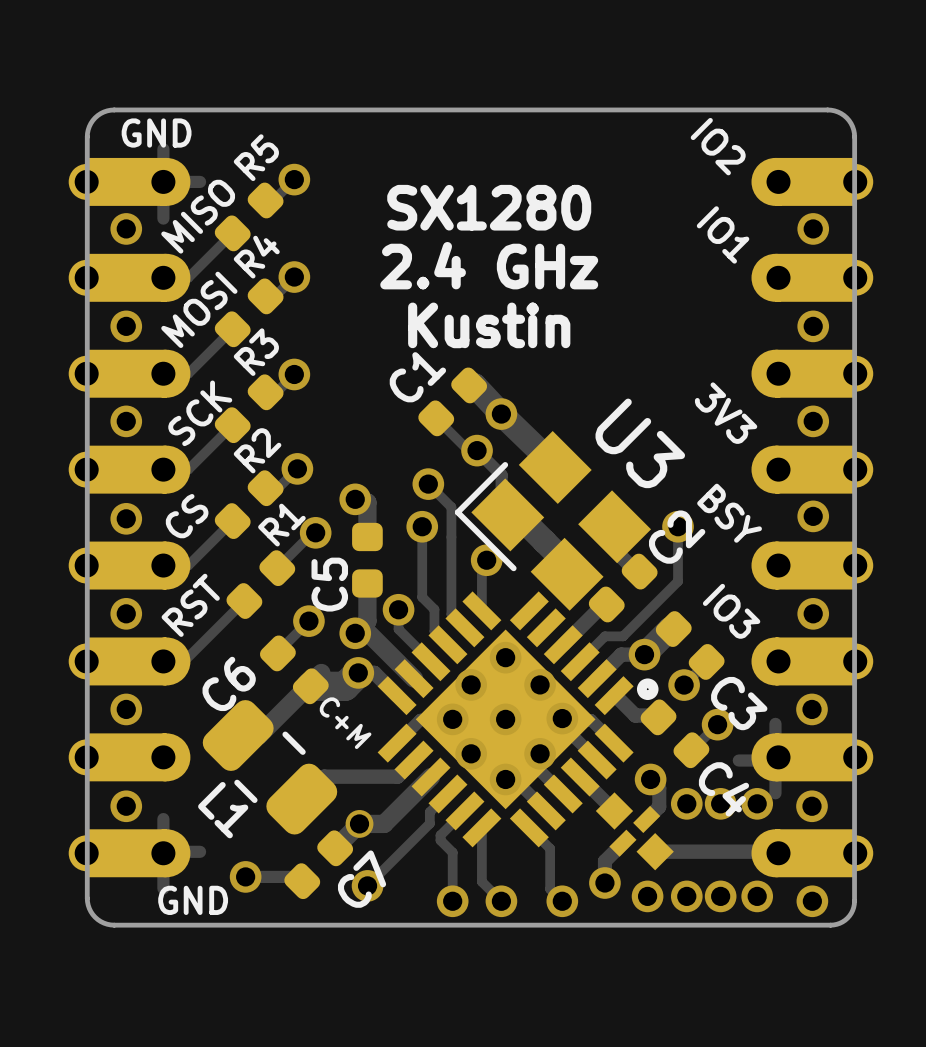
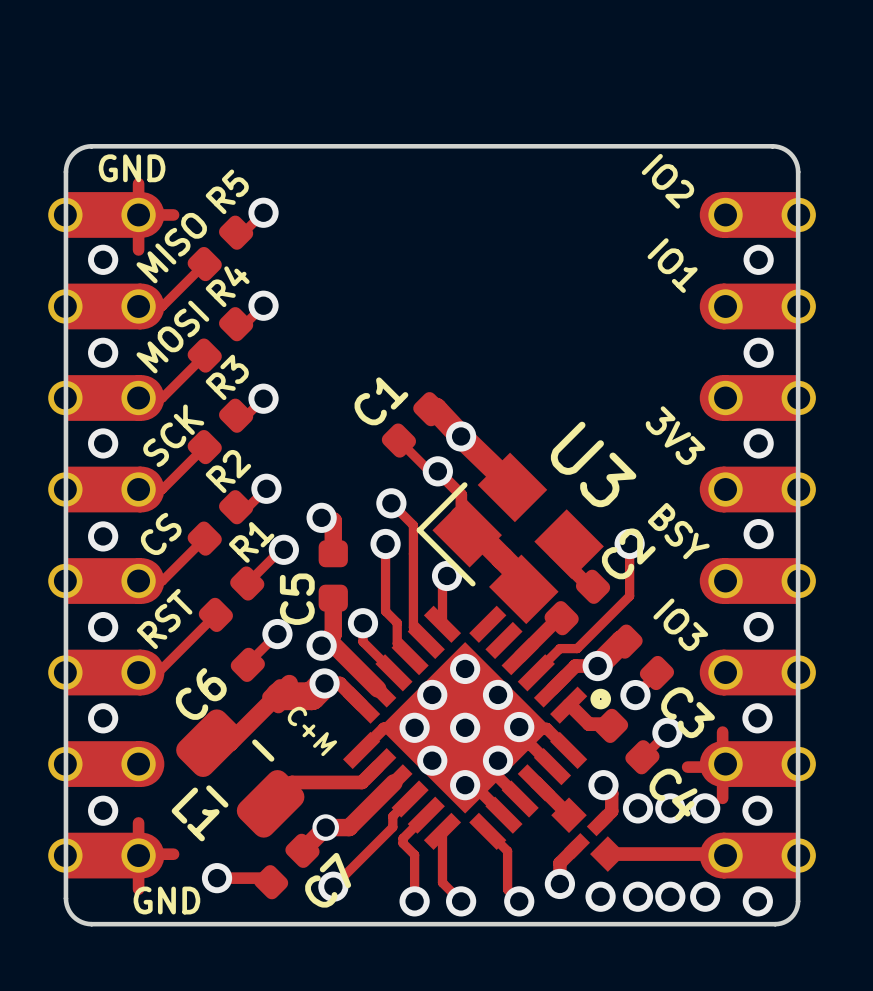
text: SX1280 (489, 207) -> none
text: 2.4 GHz (489, 265) -> none
text: Kustin (489, 325) -> none

